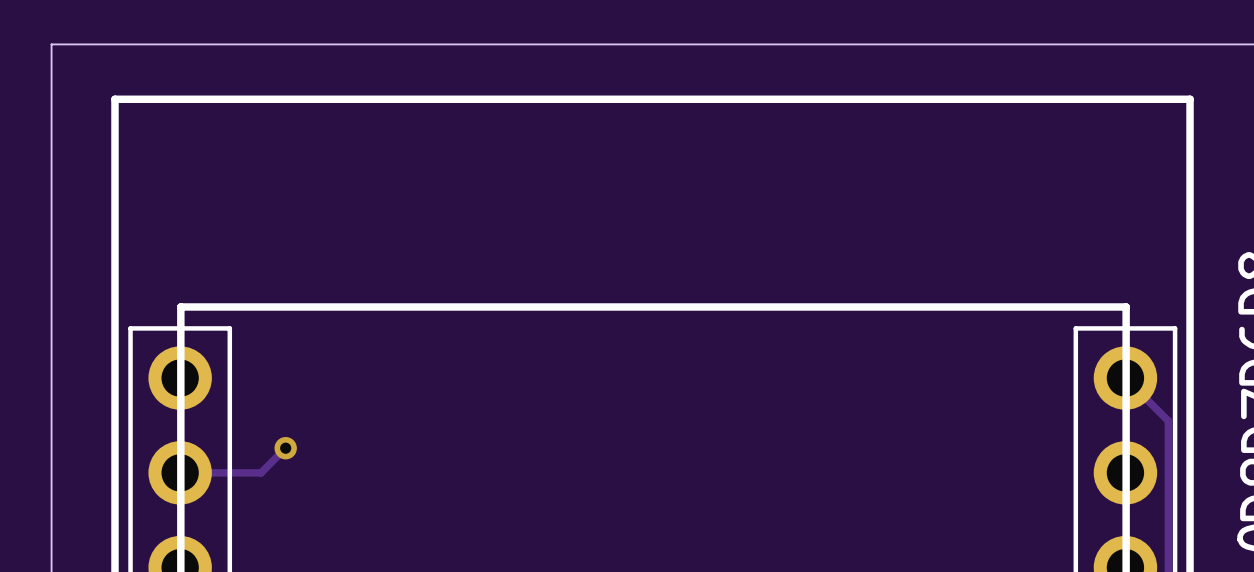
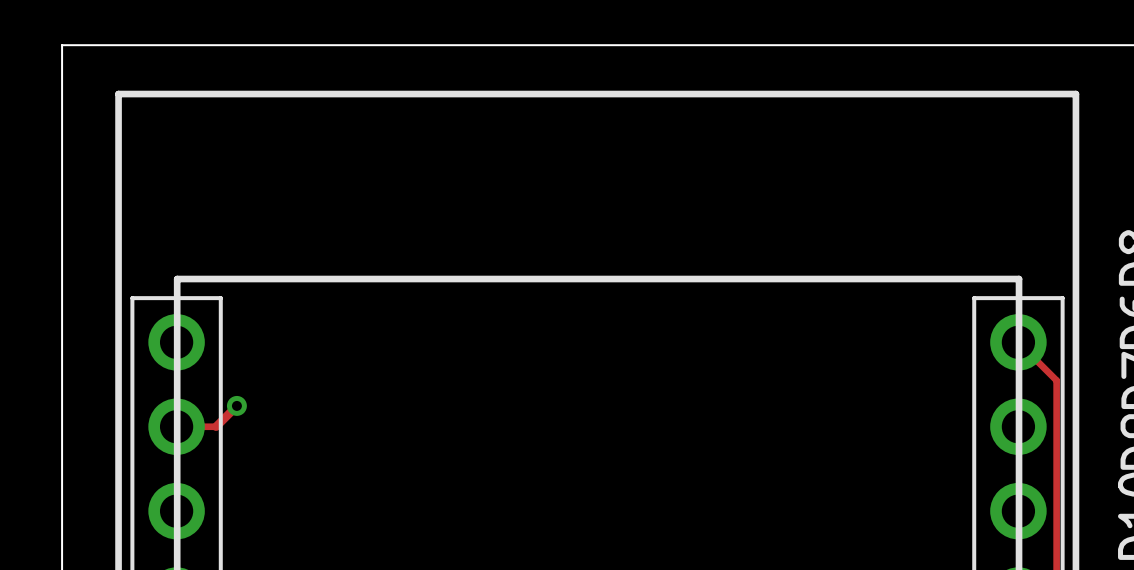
track: (285, 448) (261, 472) (224, 472) -> (236, 405) (216, 426)
via position: (285, 448) -> (236, 405)

